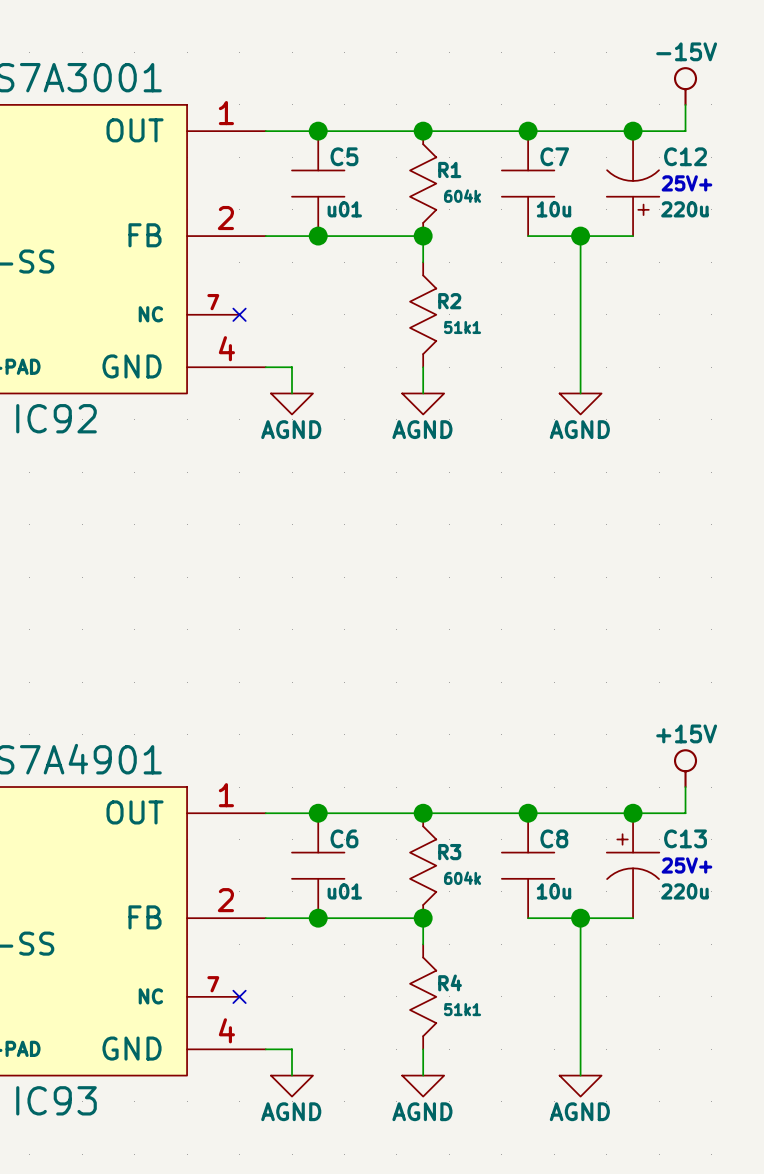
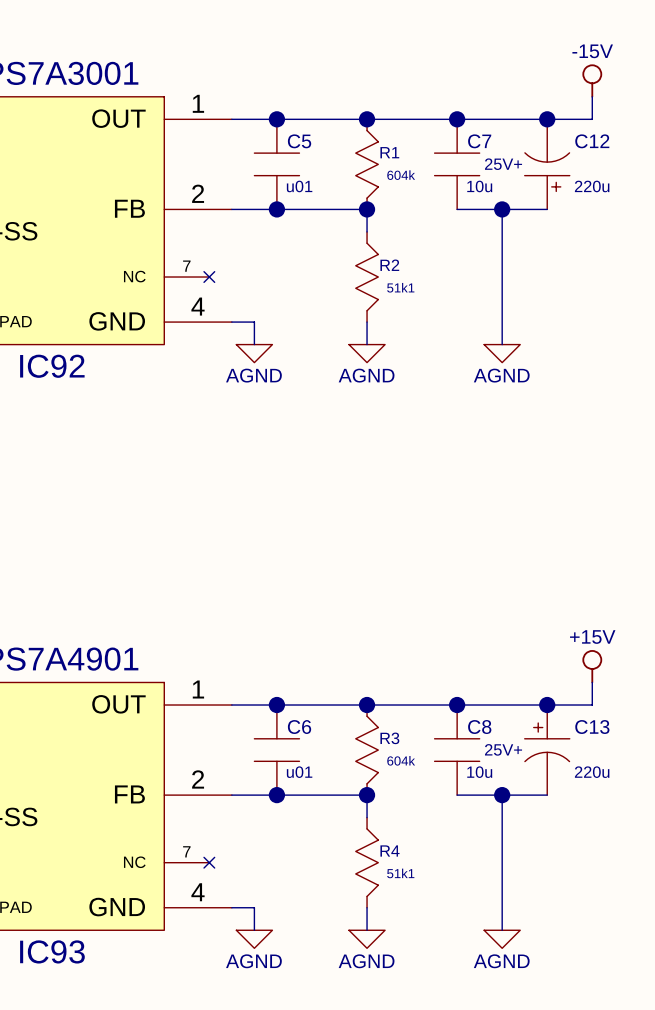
text position: 25V+ (686, 183) -> 25V+ (503, 164)
text position: 25V+ (686, 865) -> 25V+ (503, 749)

